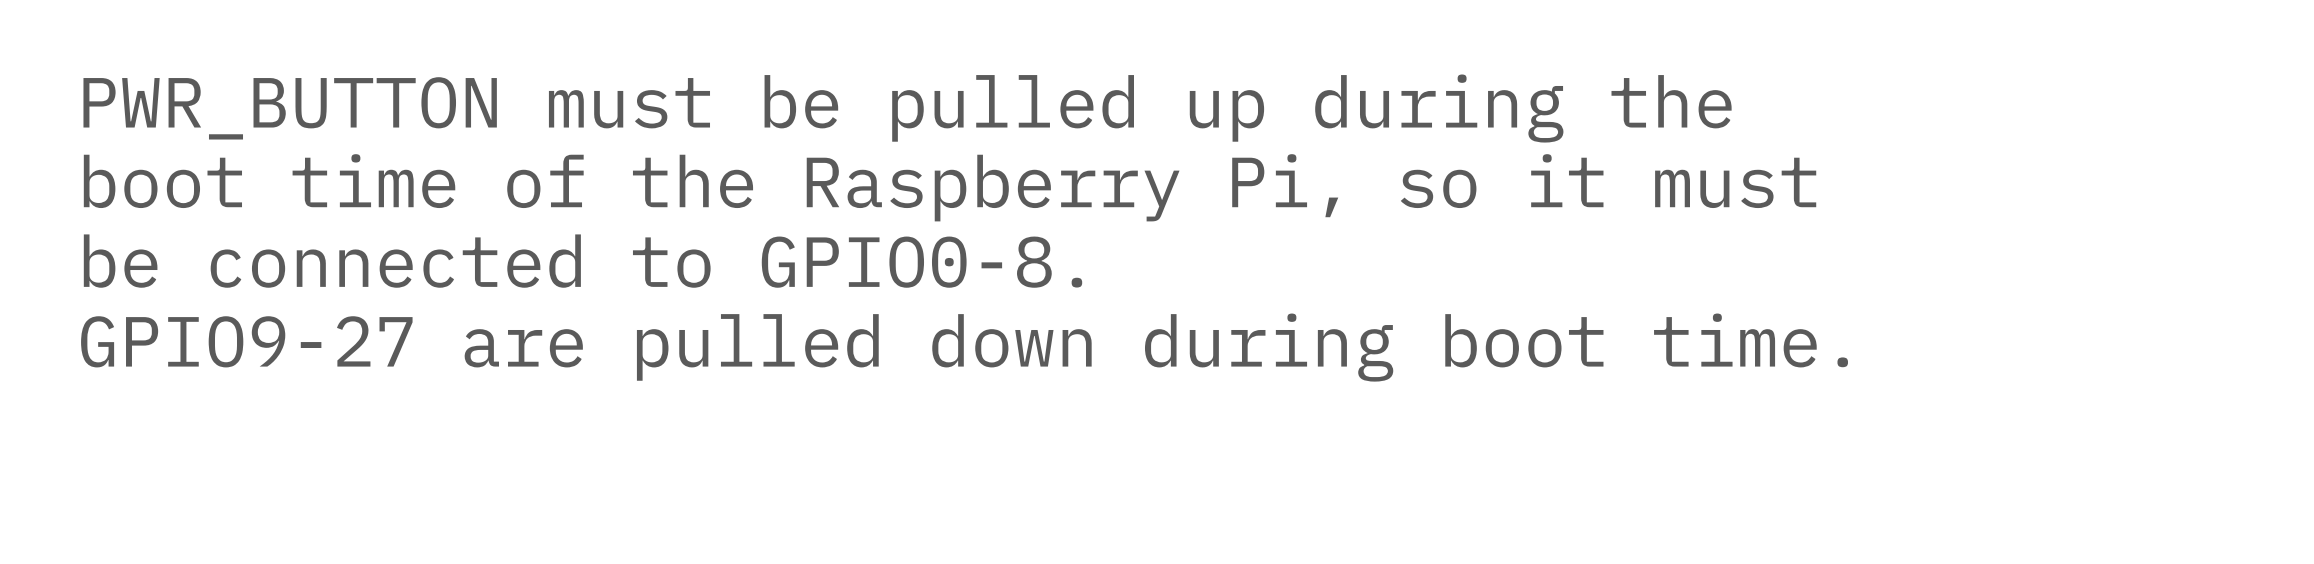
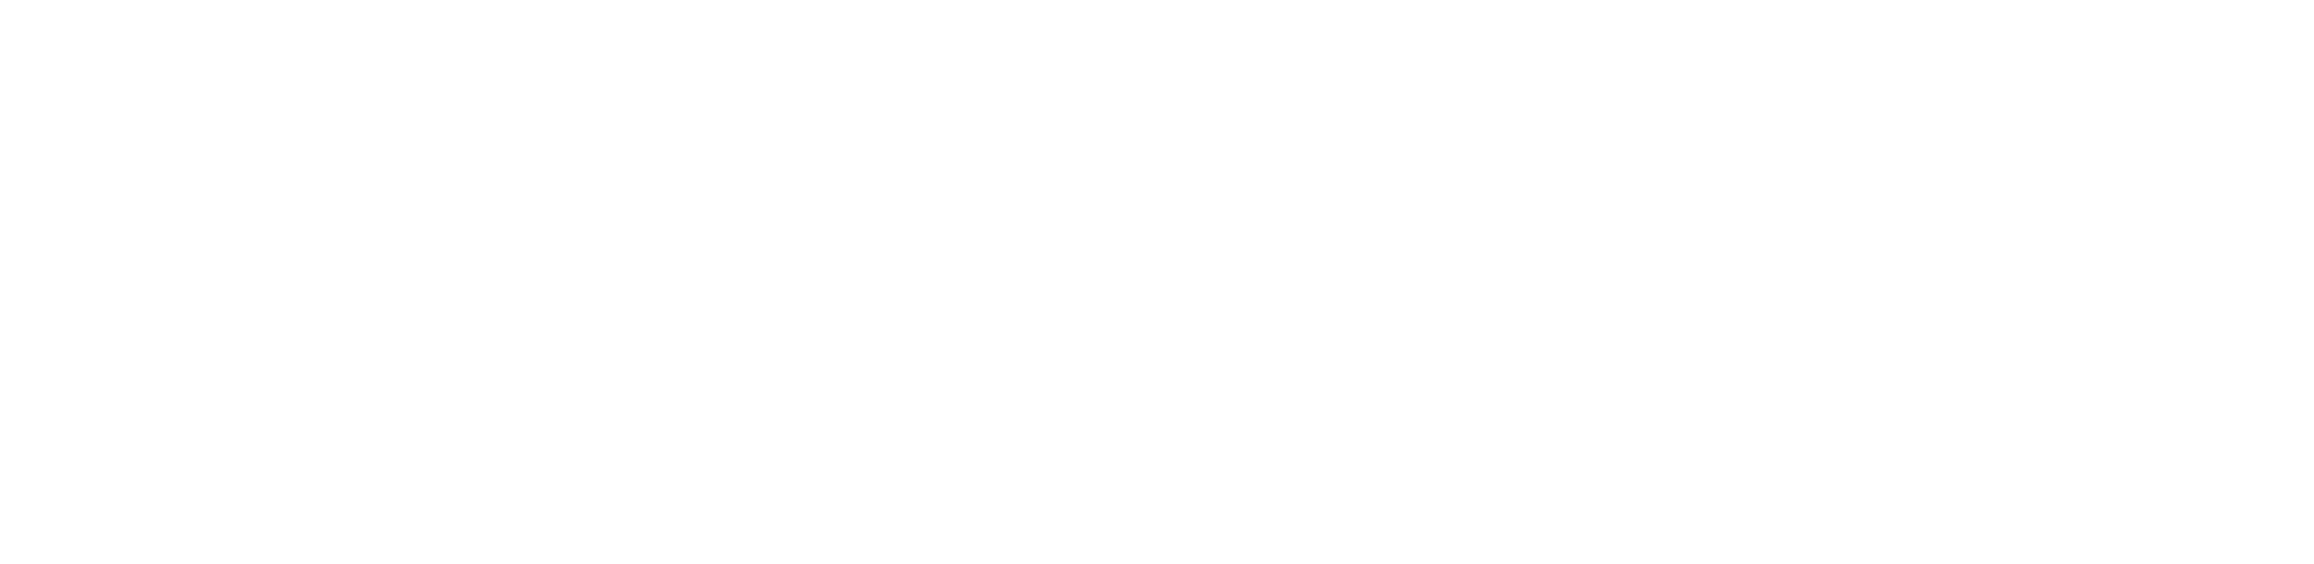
text: PWR_BUTTON must be pulled up during the (907, 108) -> none
text: boot time of the Raspberry Pi, so it must (950, 187) -> none
text: be connected to GPIO0-8. (582, 261) -> none
text: GPIO9-27 are pulled down during boot time. (964, 347) -> none

